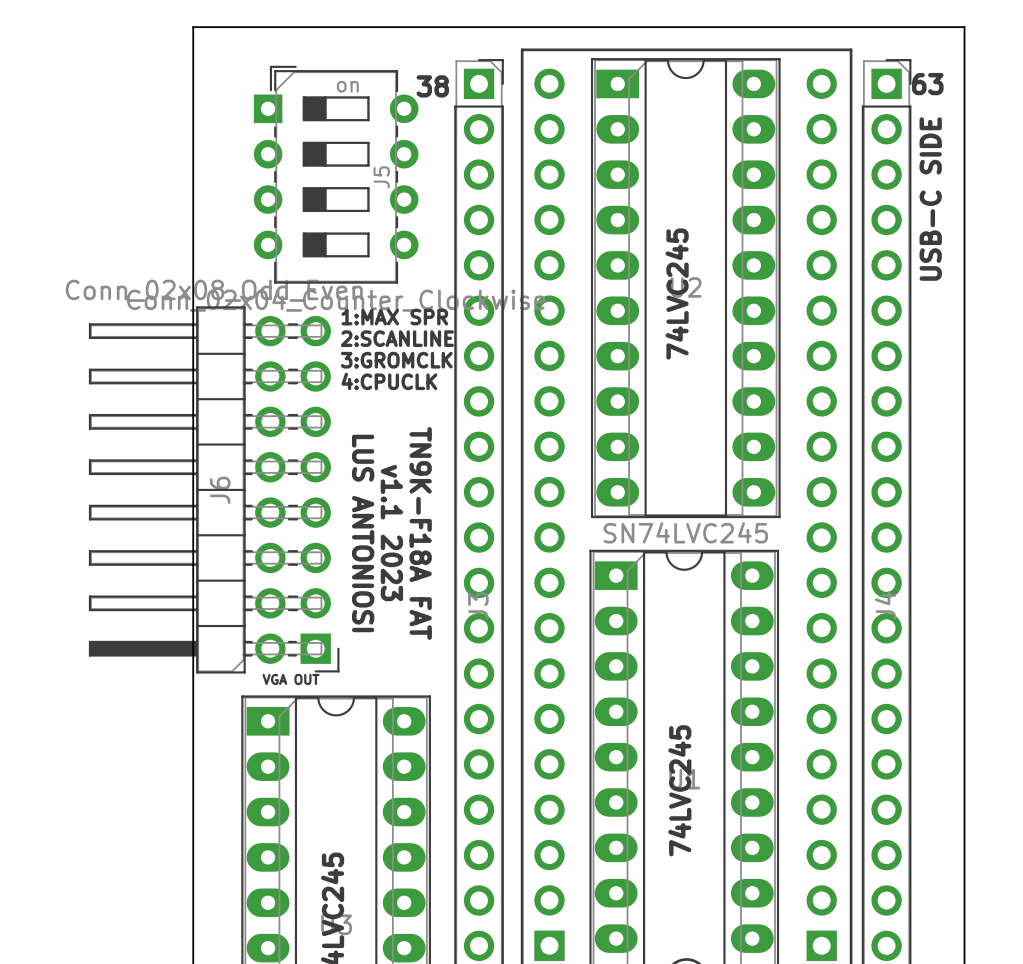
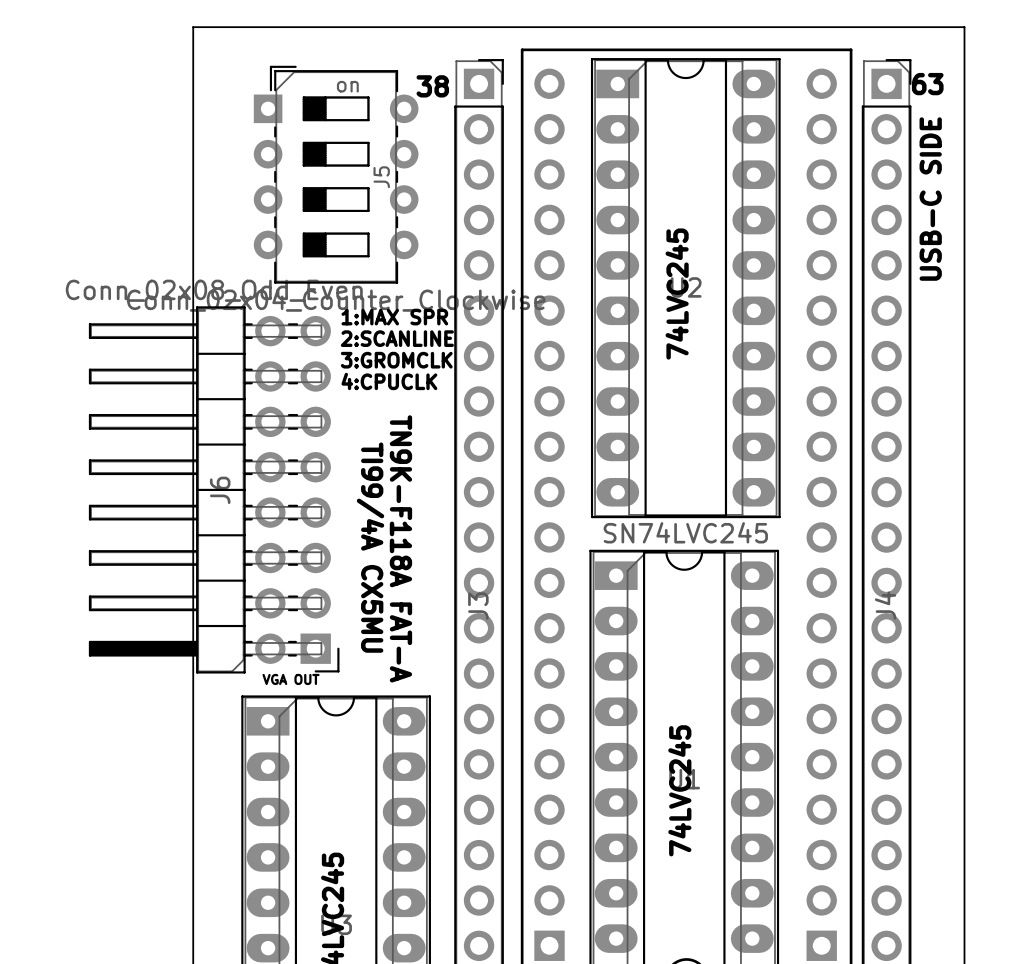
text: LUS ANTONIOSI (363, 533) -> none
text: v1.1 2023 (391, 533) -> none
text: TN9K-F18A FAT (420, 533) -> TN9K-F118A FAT-A (400, 548)
text: none -> TI99/4A CX5MU (370, 547)

